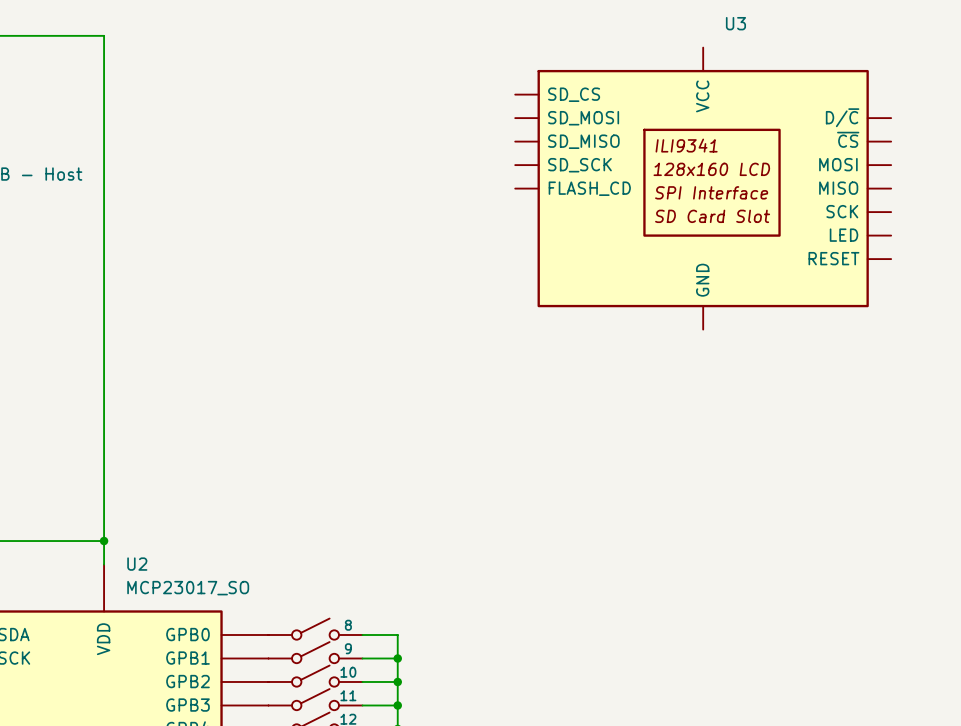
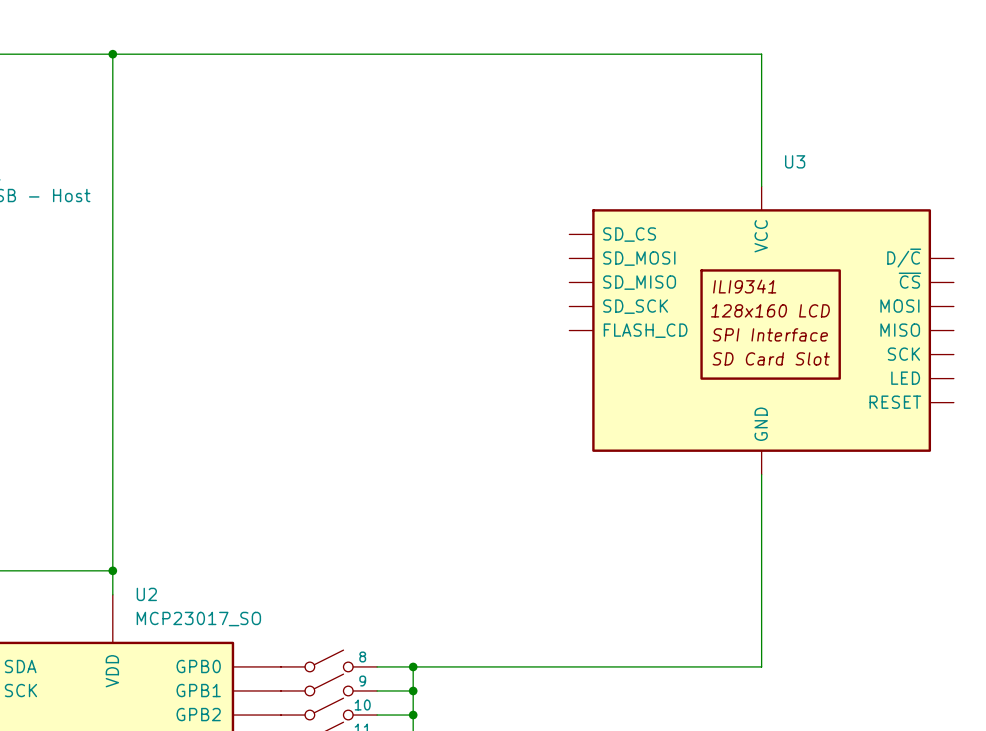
wire: none -> (112, 54) (761, 54) (761, 186)
junction: none -> (112, 54)
U3 position: (703, 188) -> (761, 330)
wire: none -> (761, 474) (761, 666) (413, 666)
junction: none -> (413, 666)

